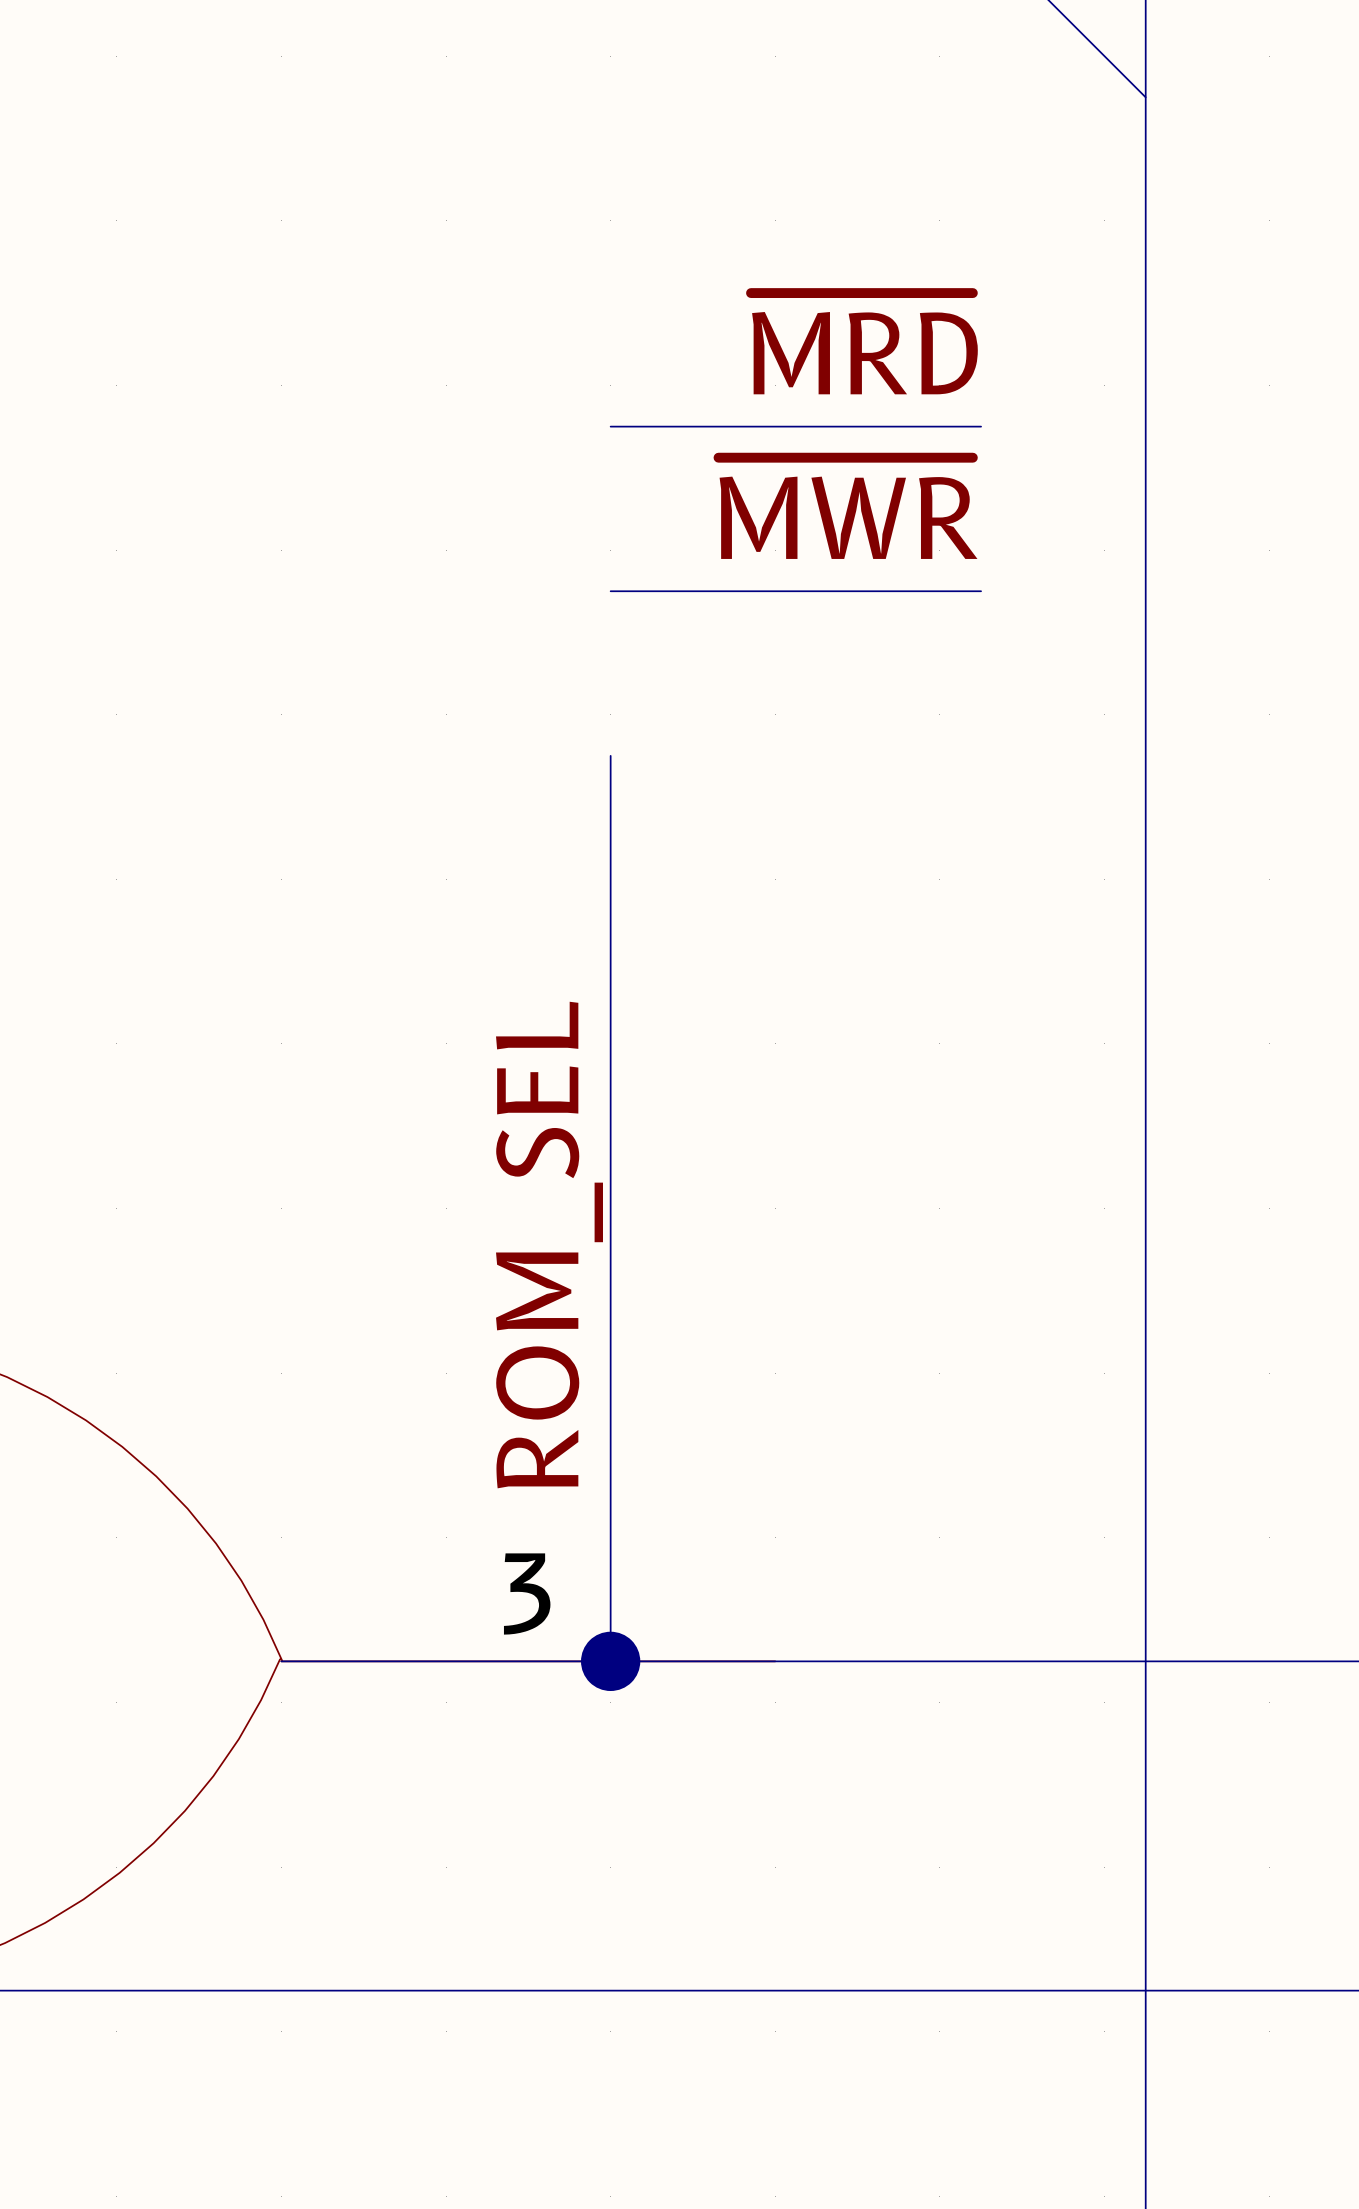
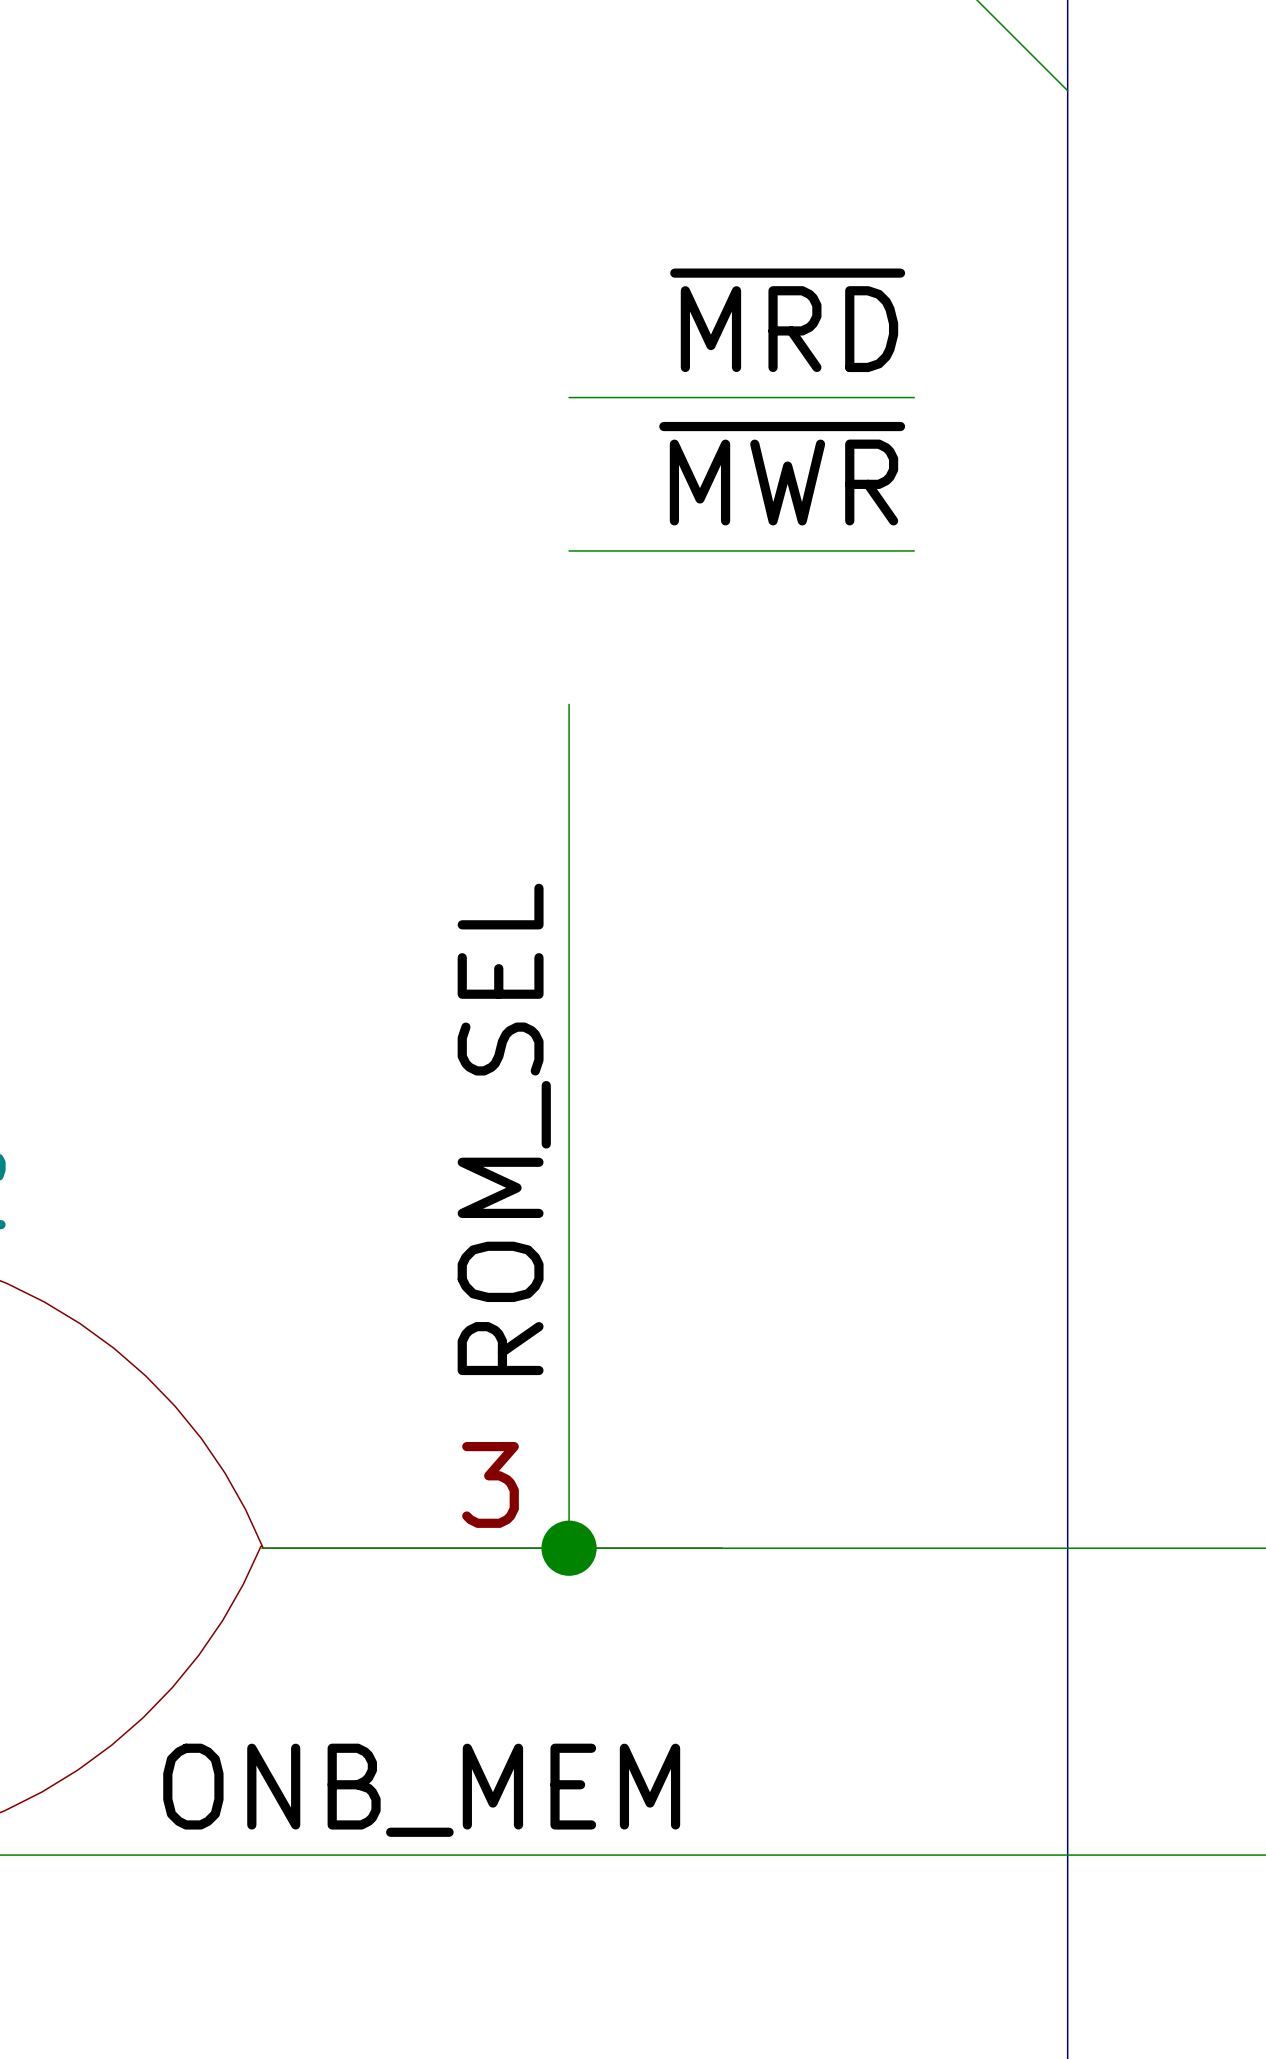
label: none -> ONB_MEM (421, 1790)

